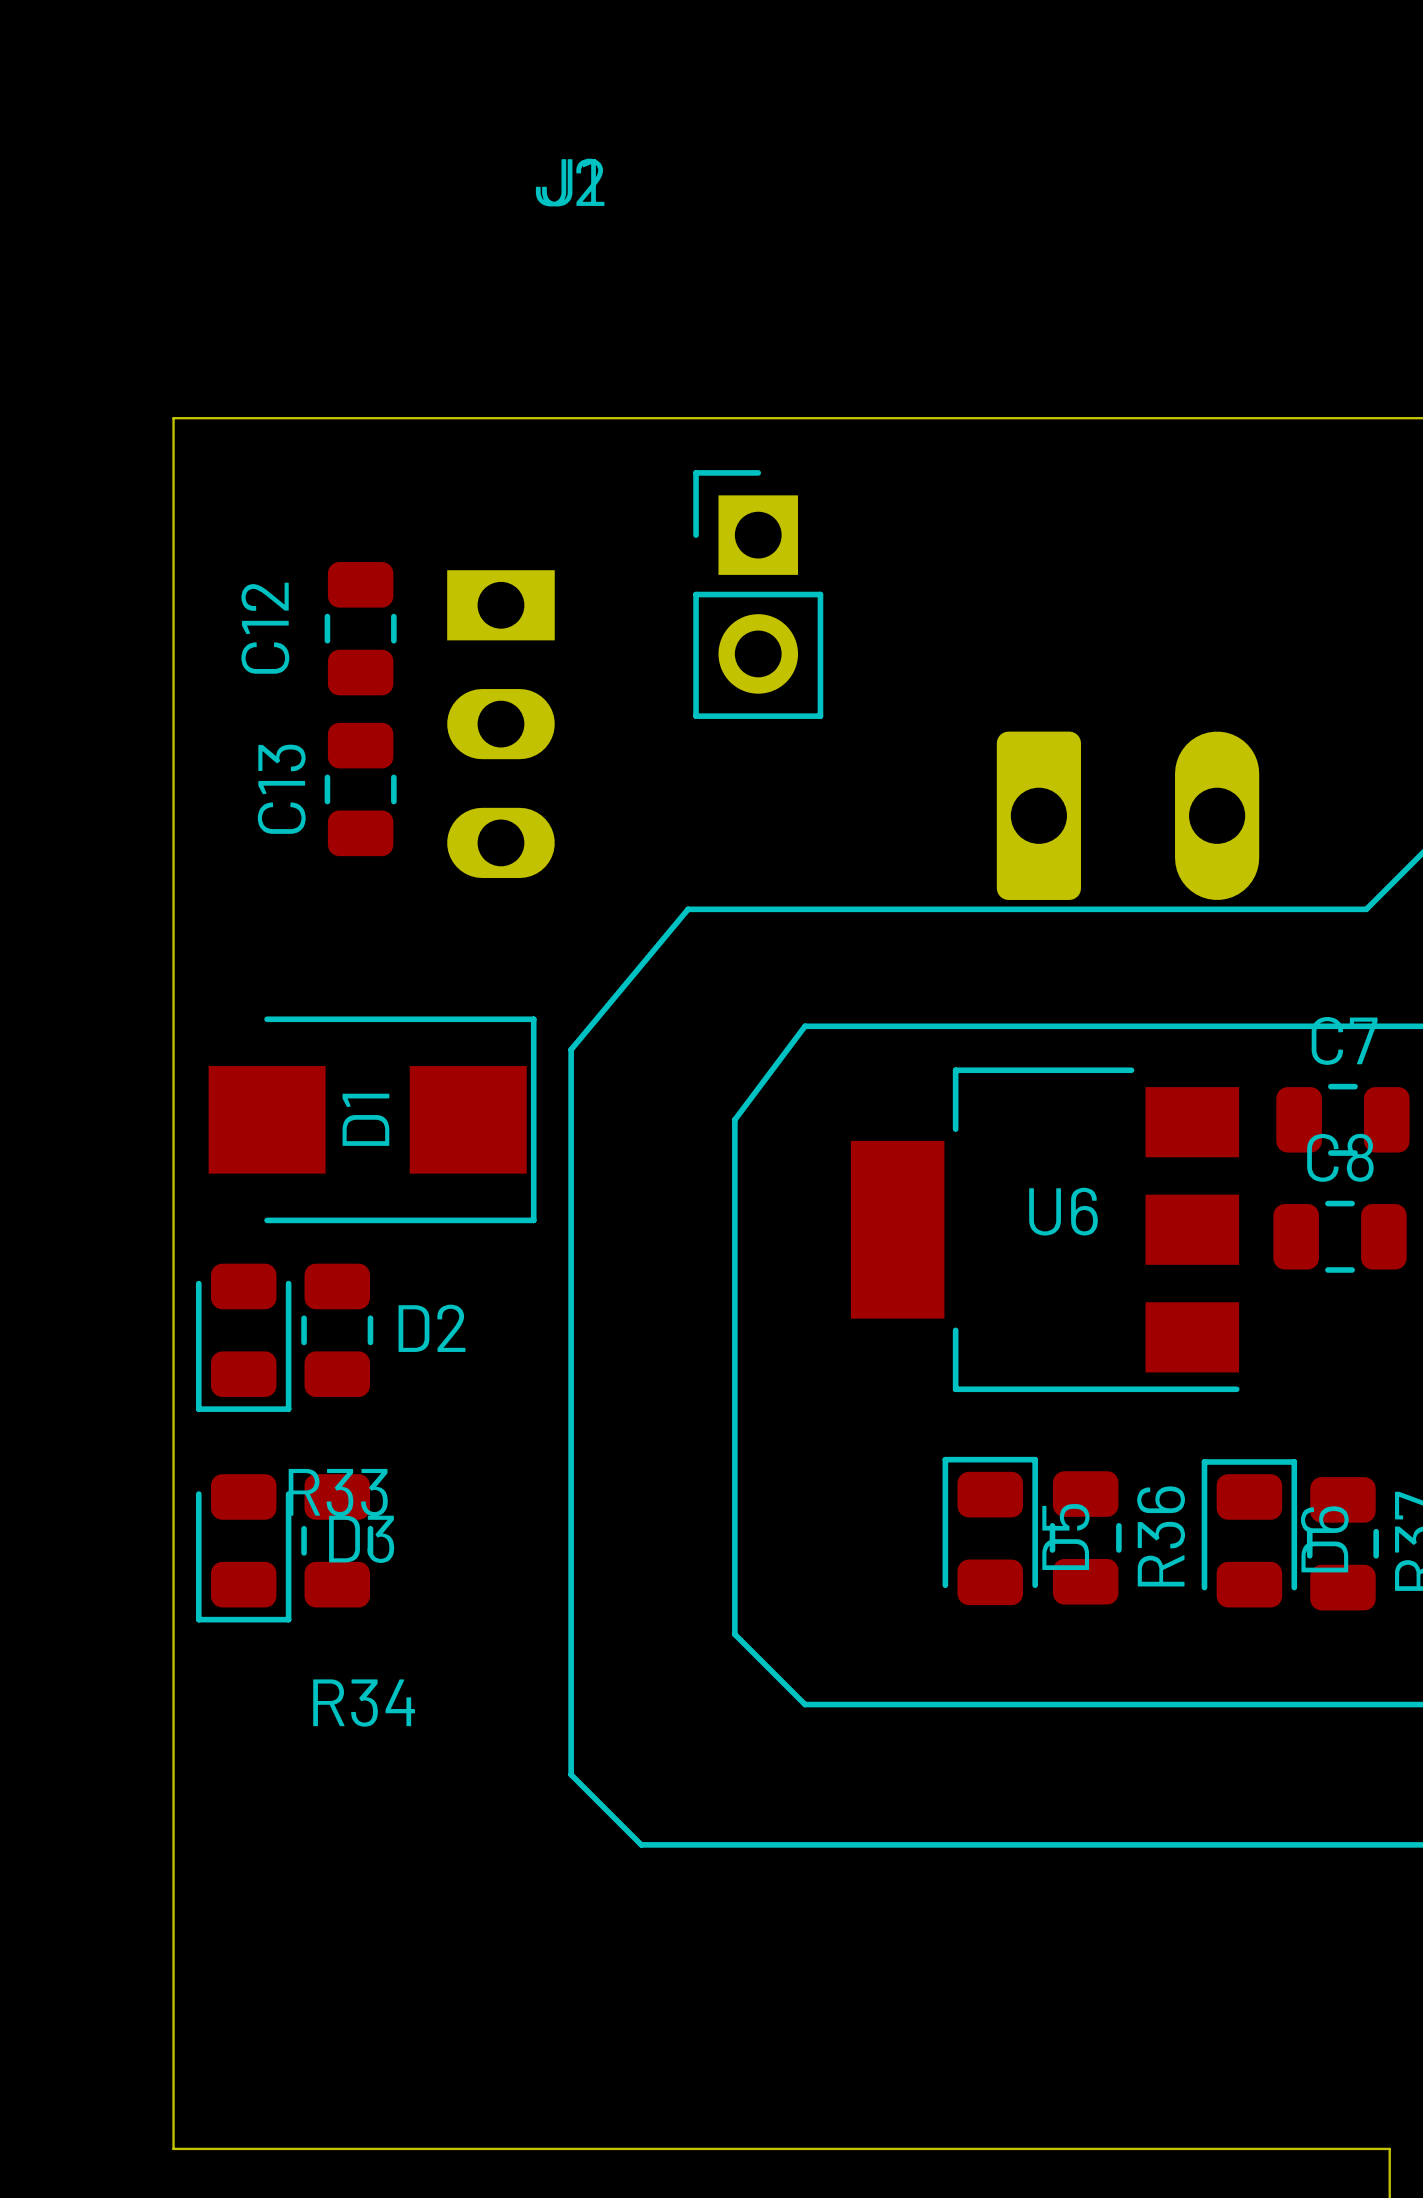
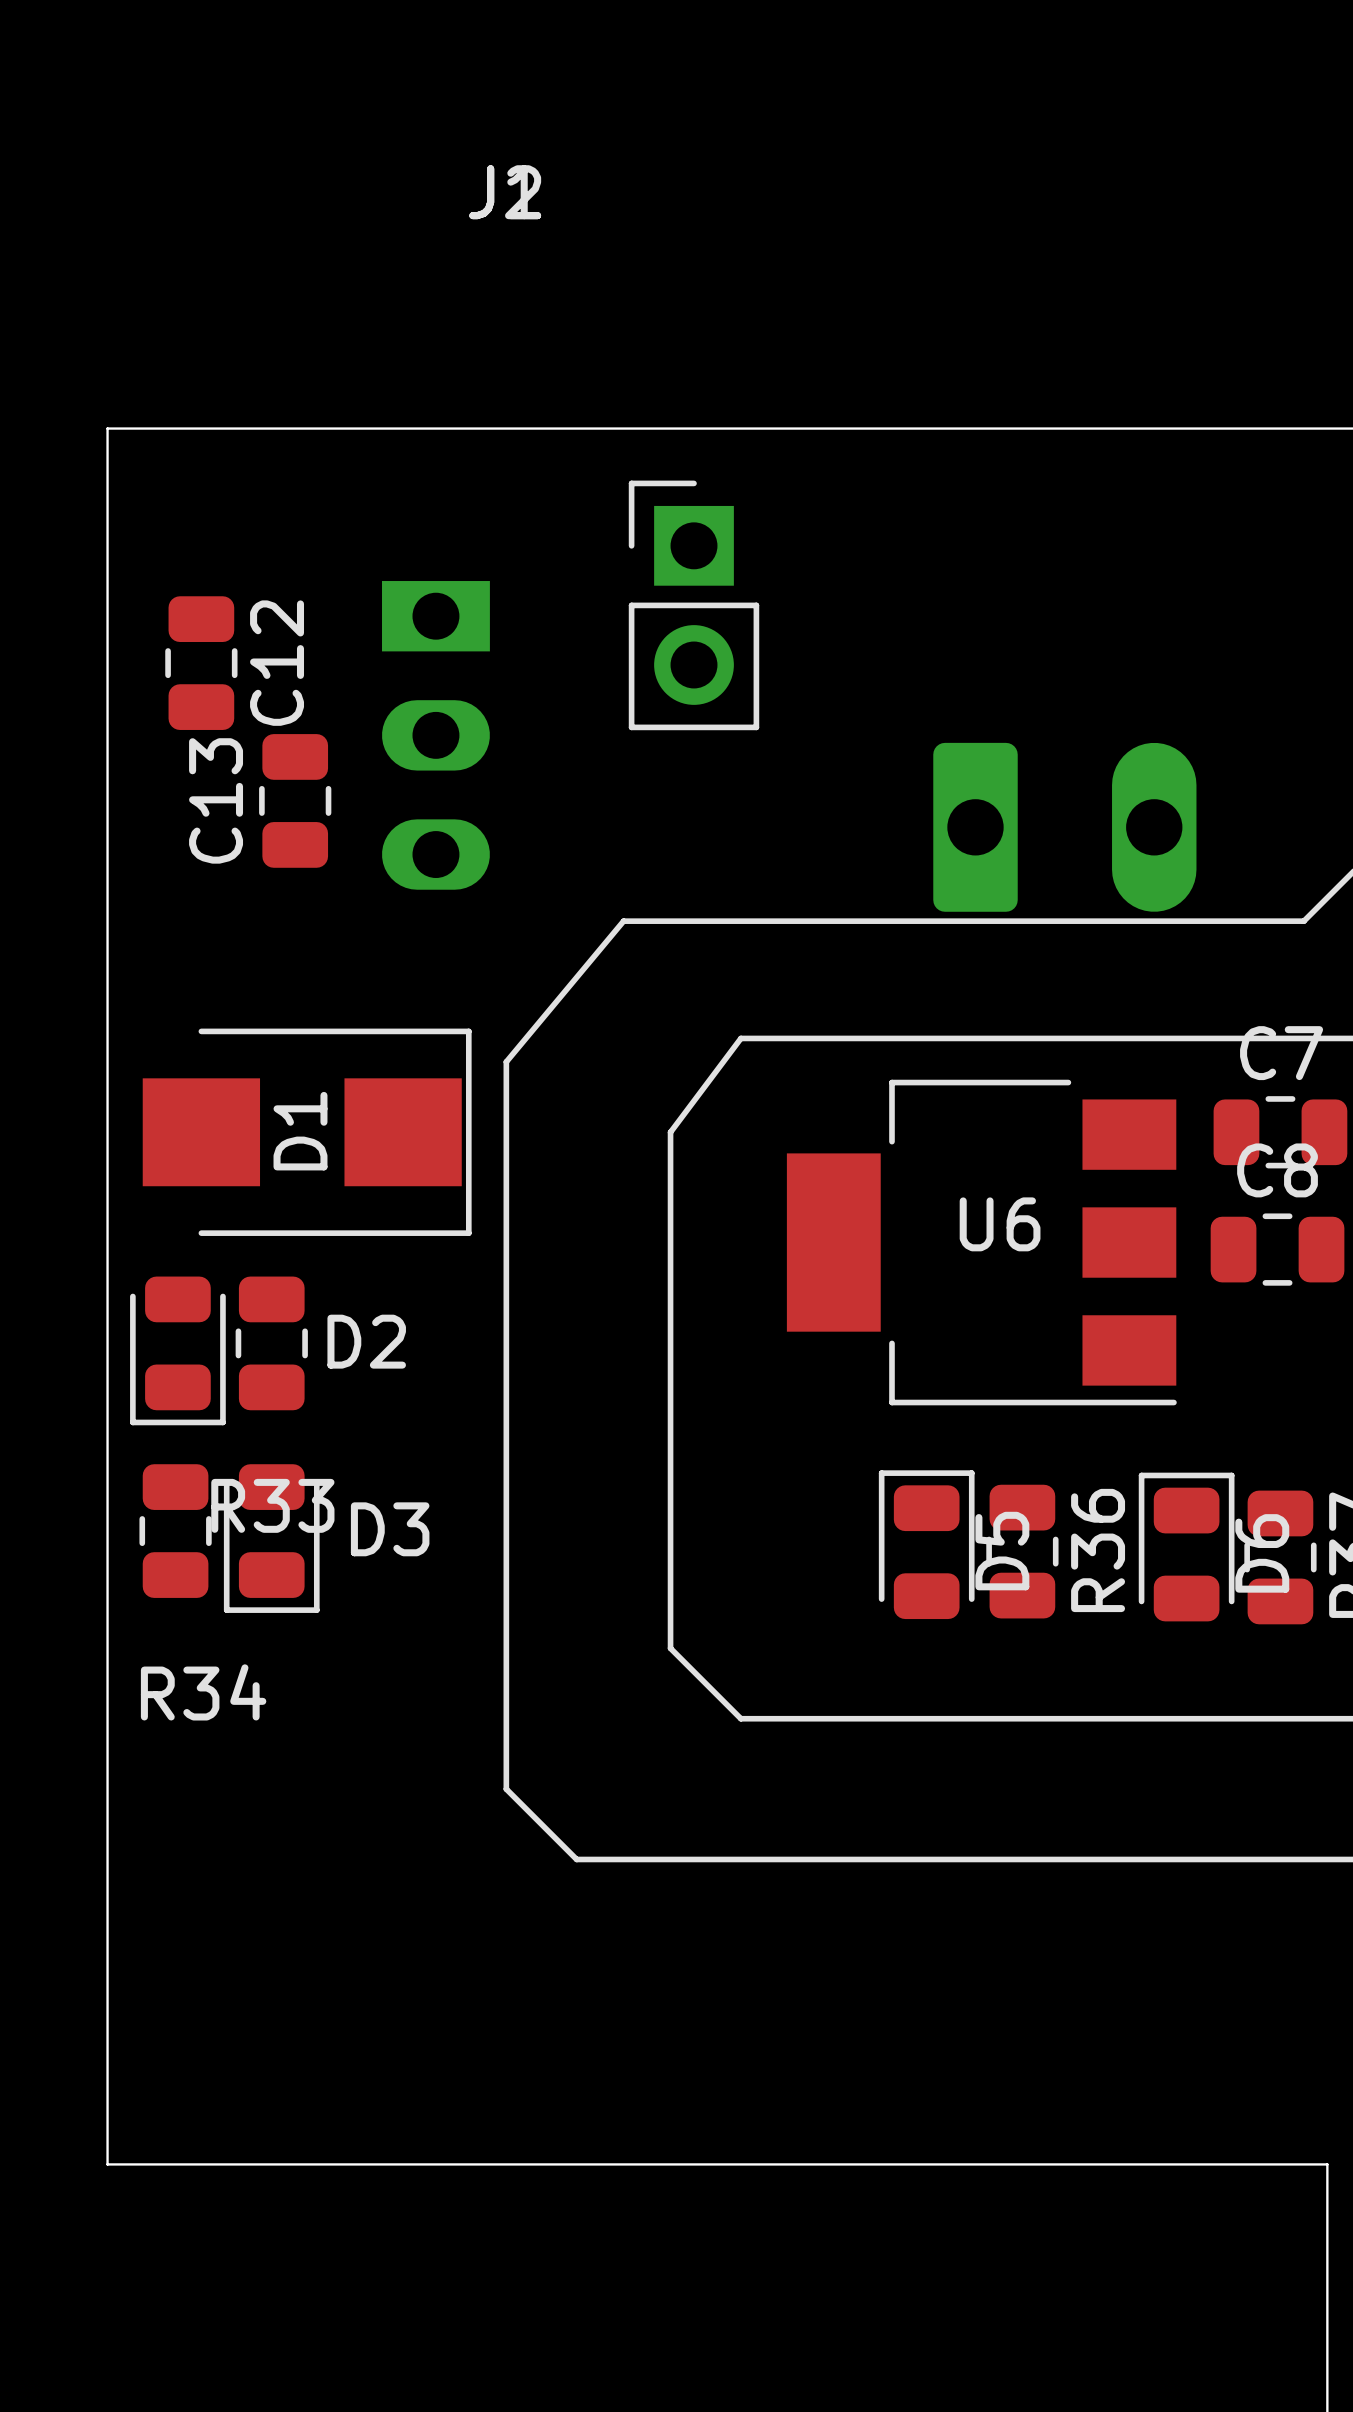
C12 name position: C12 (265, 628) -> C12 (277, 663)
C12 position: (360, 628) -> (201, 663)
R34 position: (337, 1540) -> (175, 1531)
D3 position: (243, 1548) -> (271, 1538)

